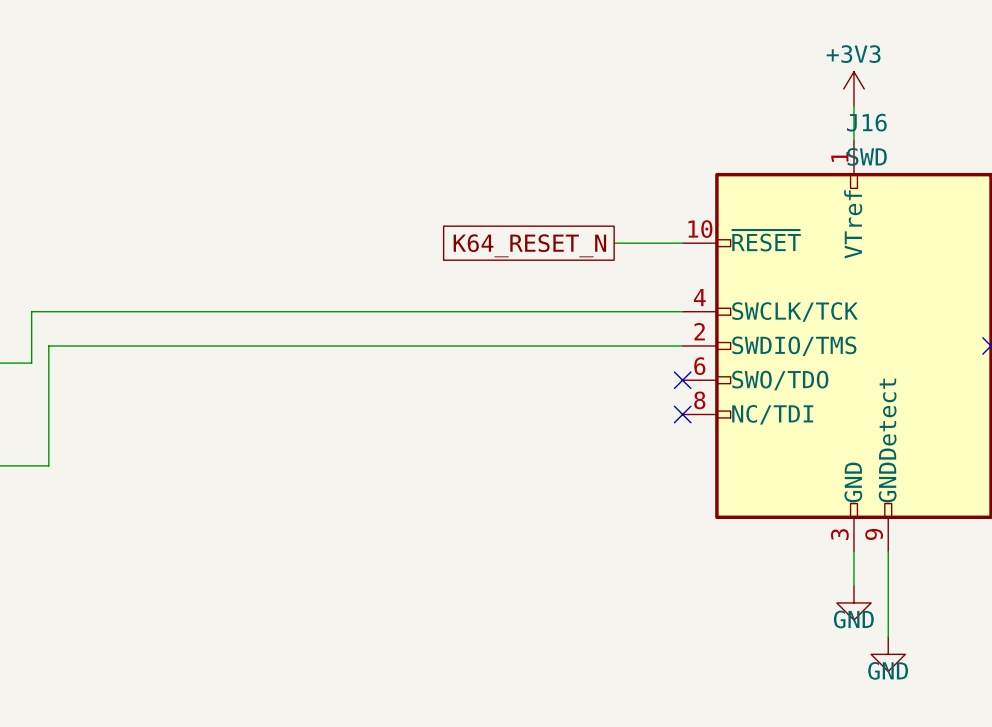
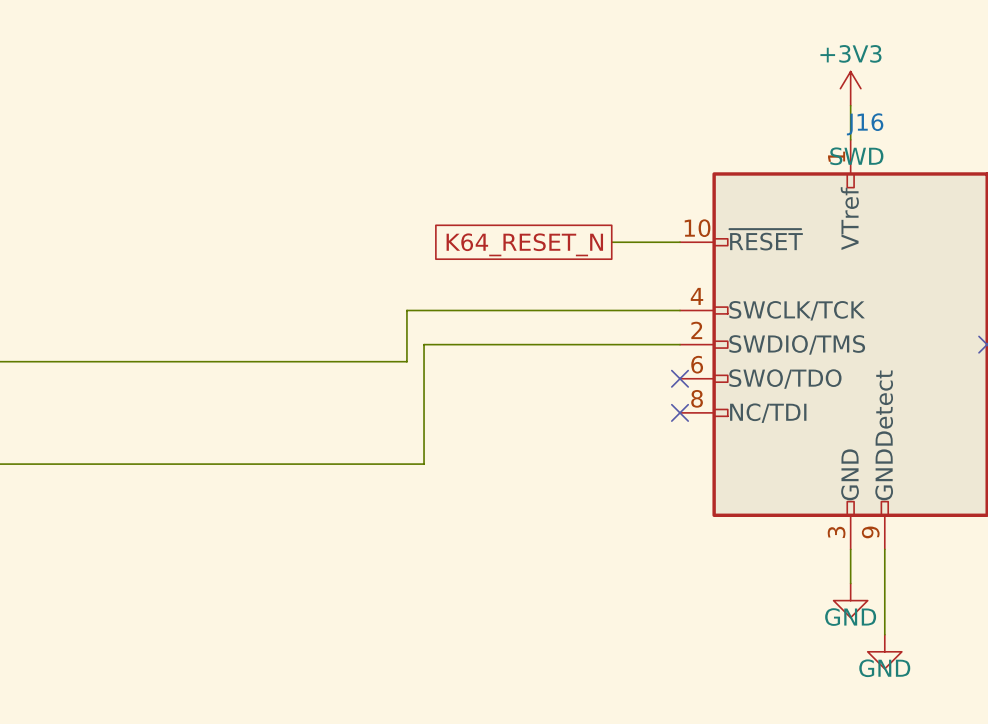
wire: (408, 311) (31, 311) (31, 363) -> (406, 310) (406, 361) (31, 361)
wire: (425, 345) (48, 345) (48, 465) -> (424, 344) (424, 464) (48, 464)

